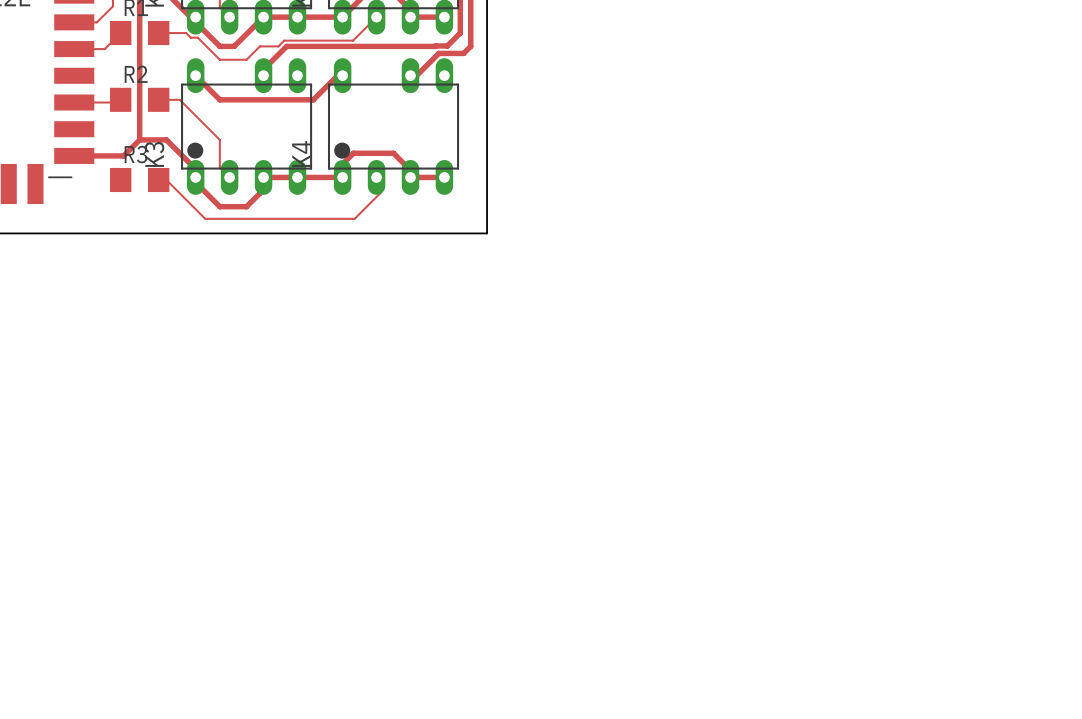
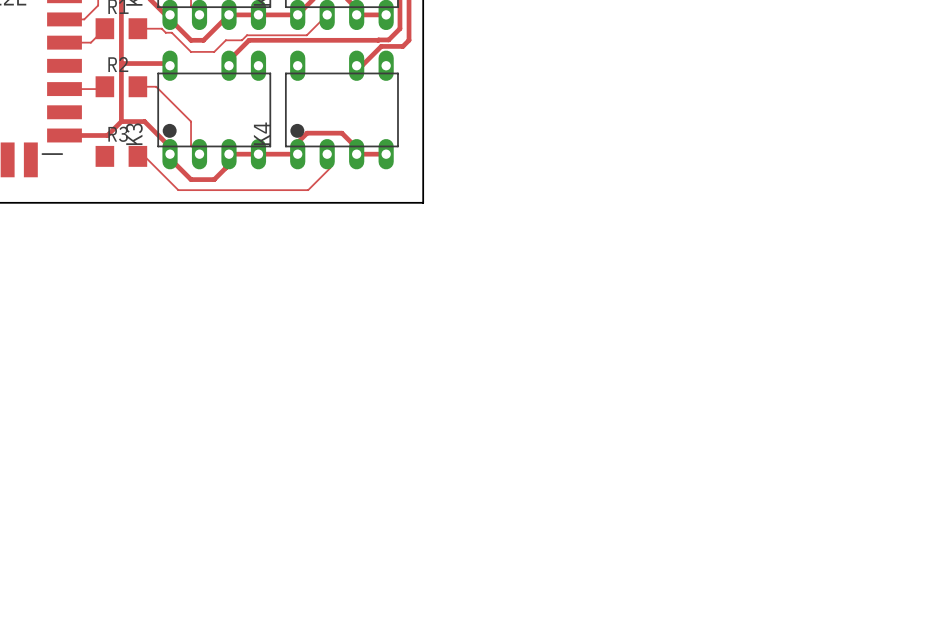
track: (195, 75) (219, 99) (313, 99) (337, 75) (342, 75) -> (170, 65) (167, 63) (121, 63)

